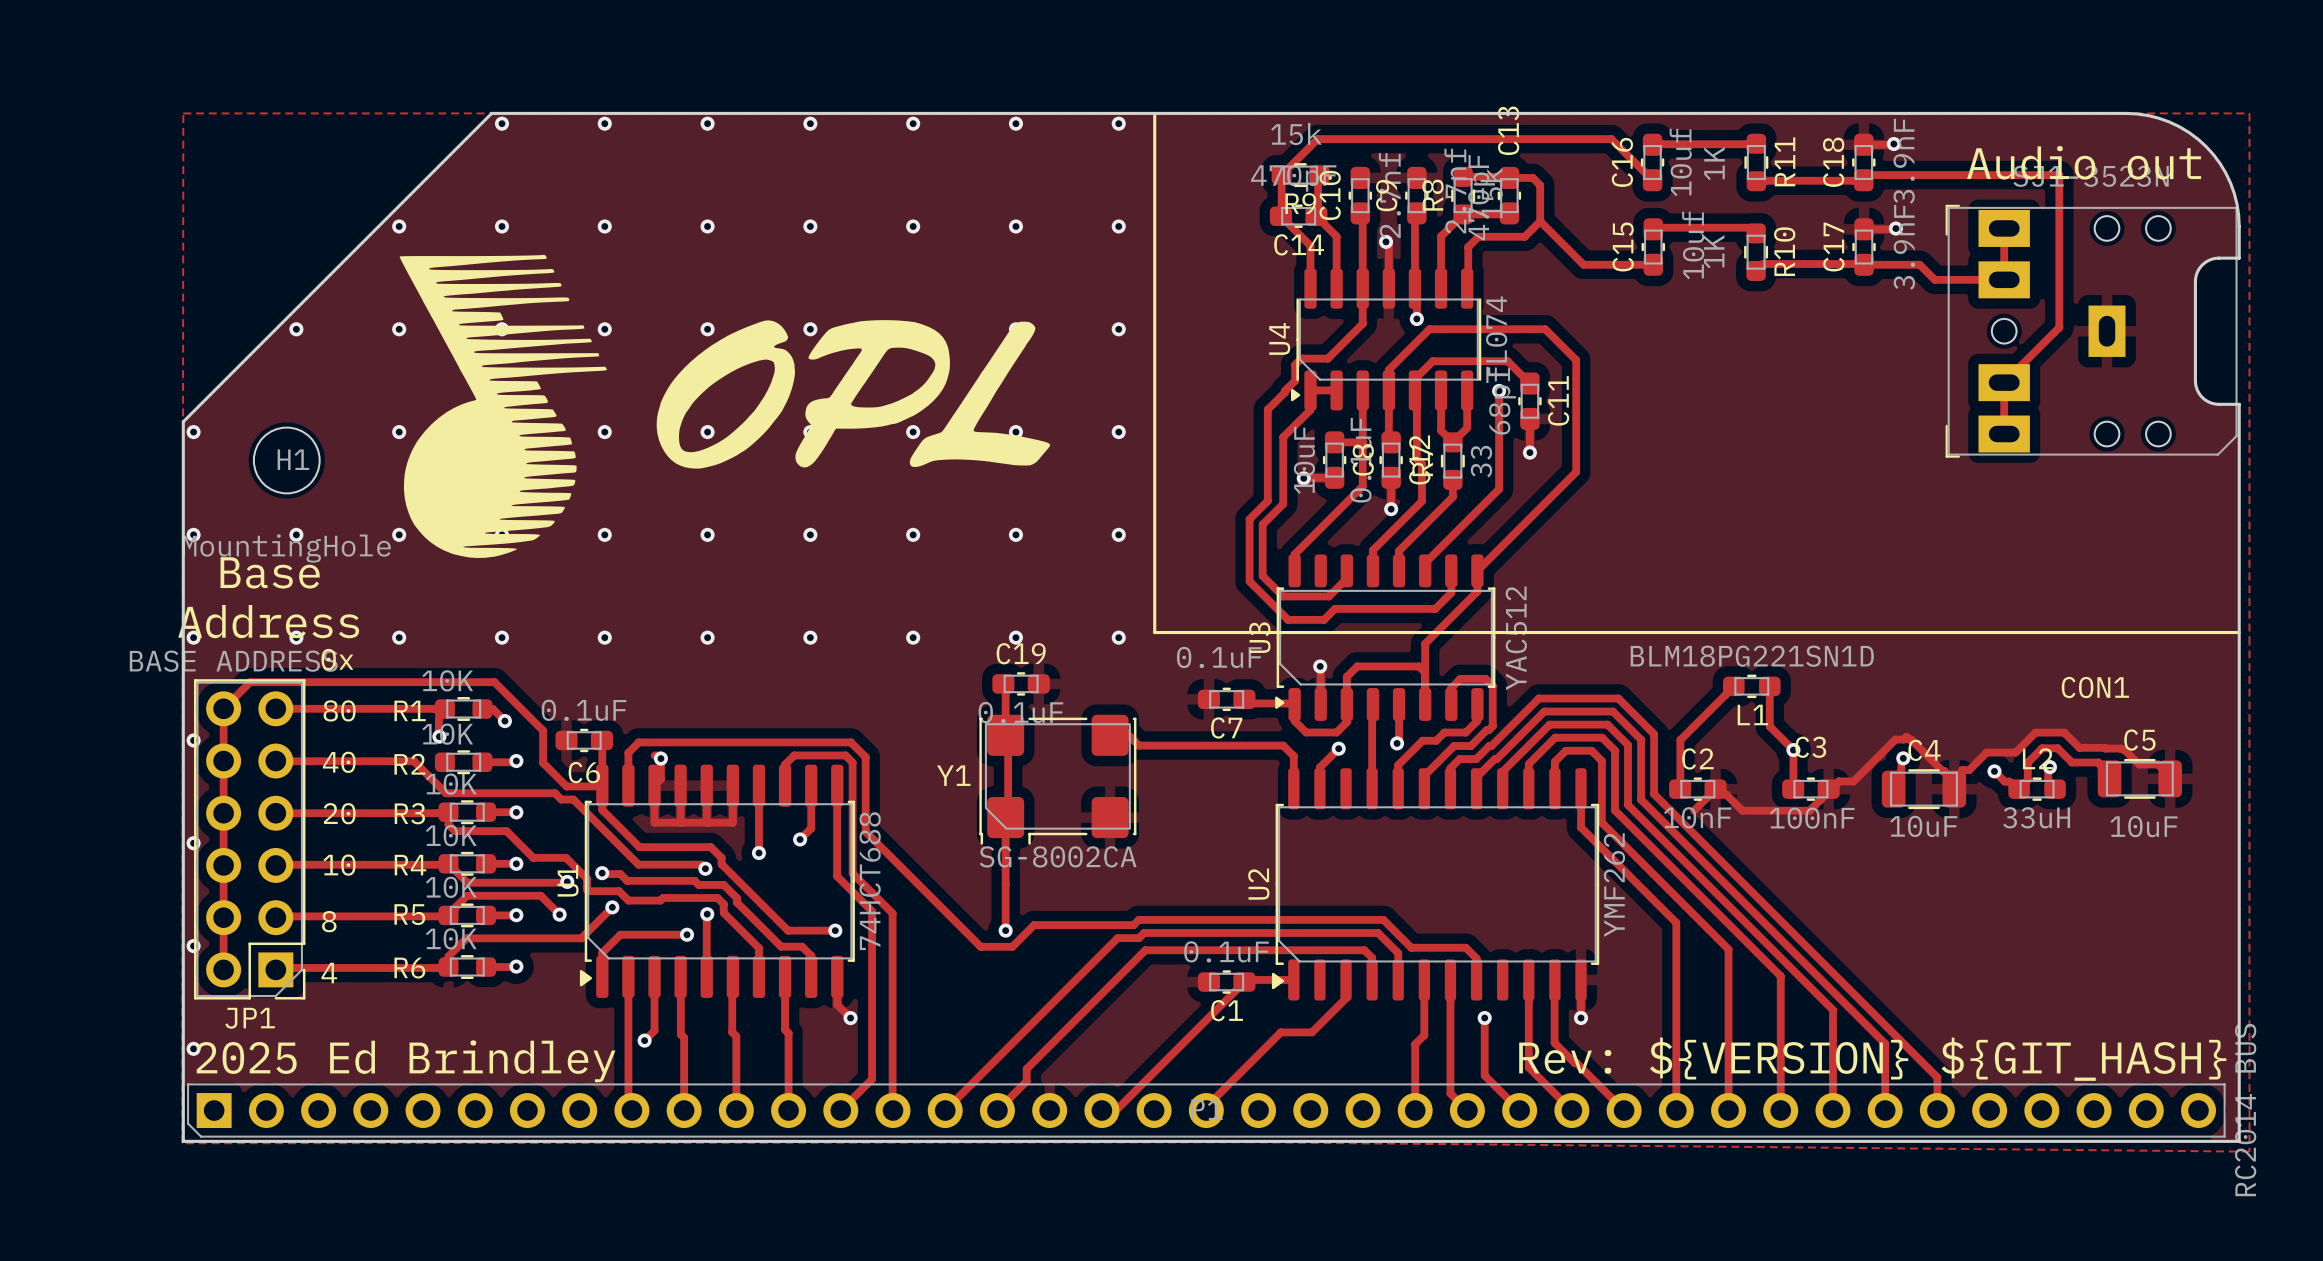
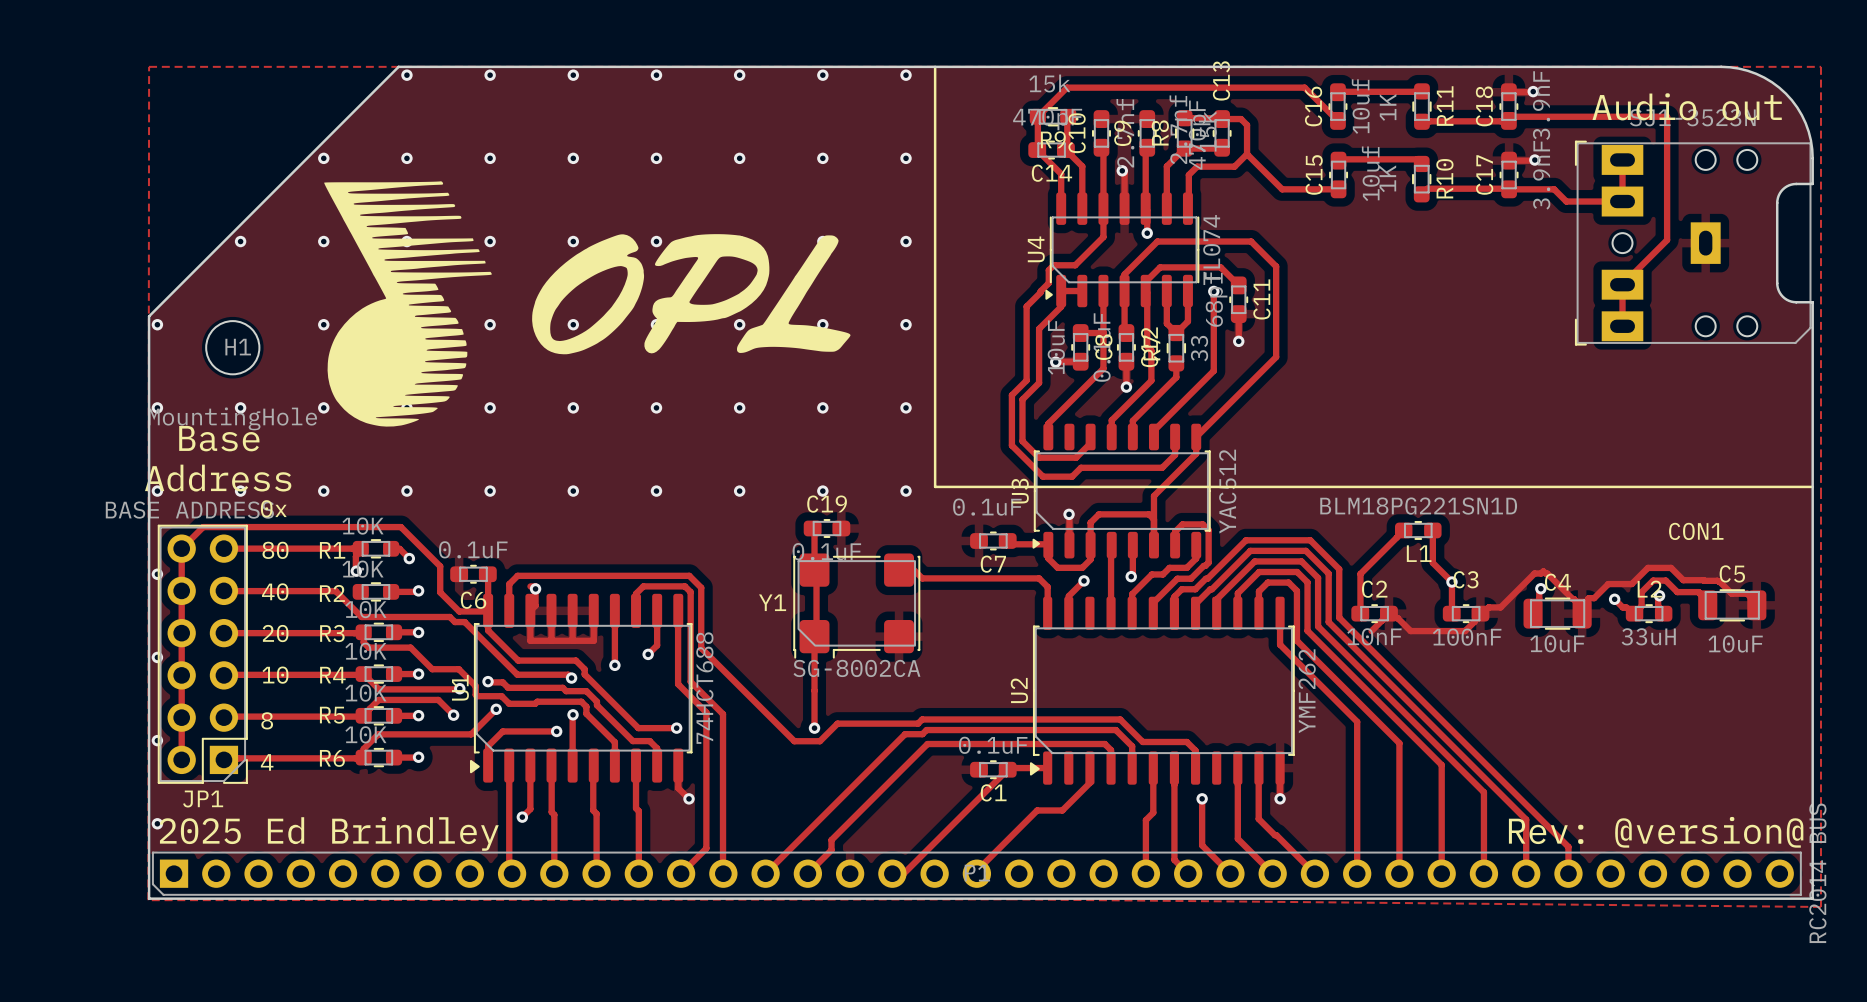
text: Rev: ${VERSION} ${GIT_HASH} (1872, 1059) -> Rev: @version@ (1656, 832)

